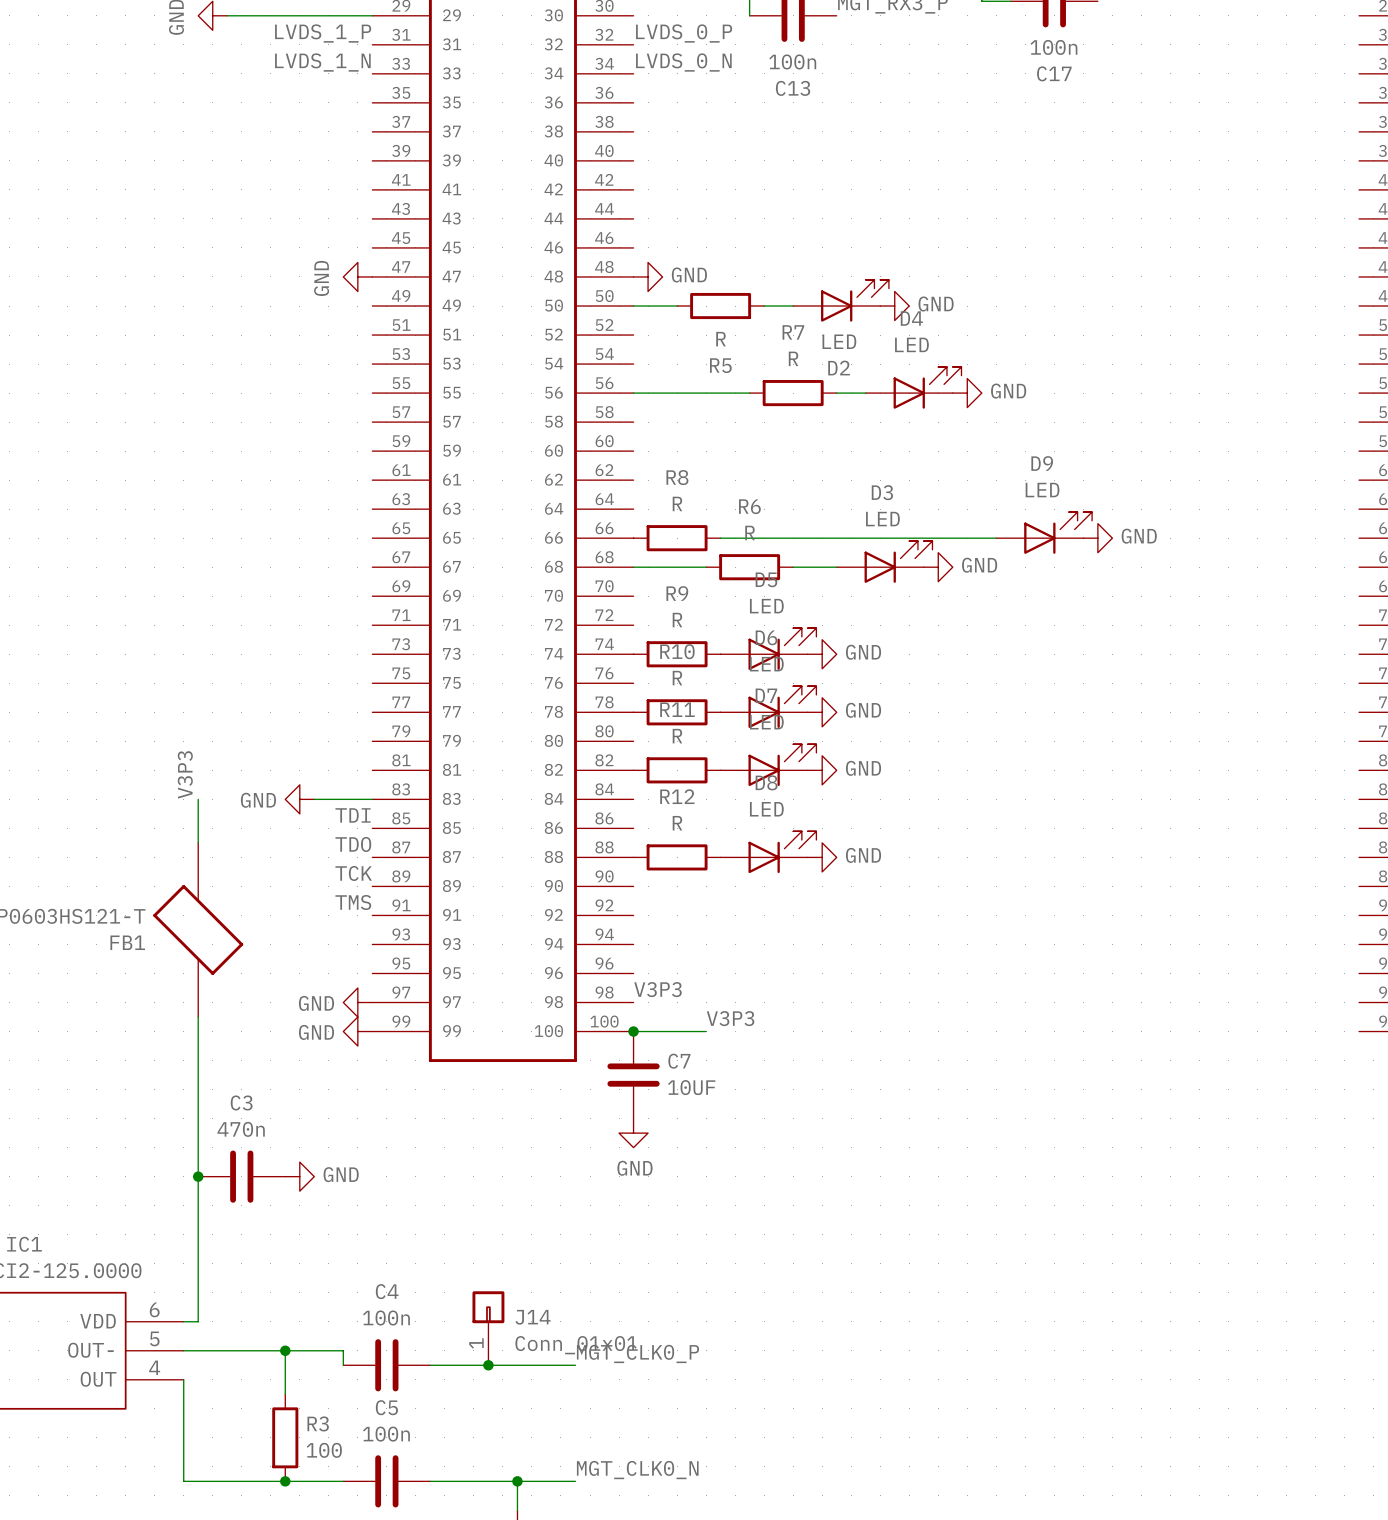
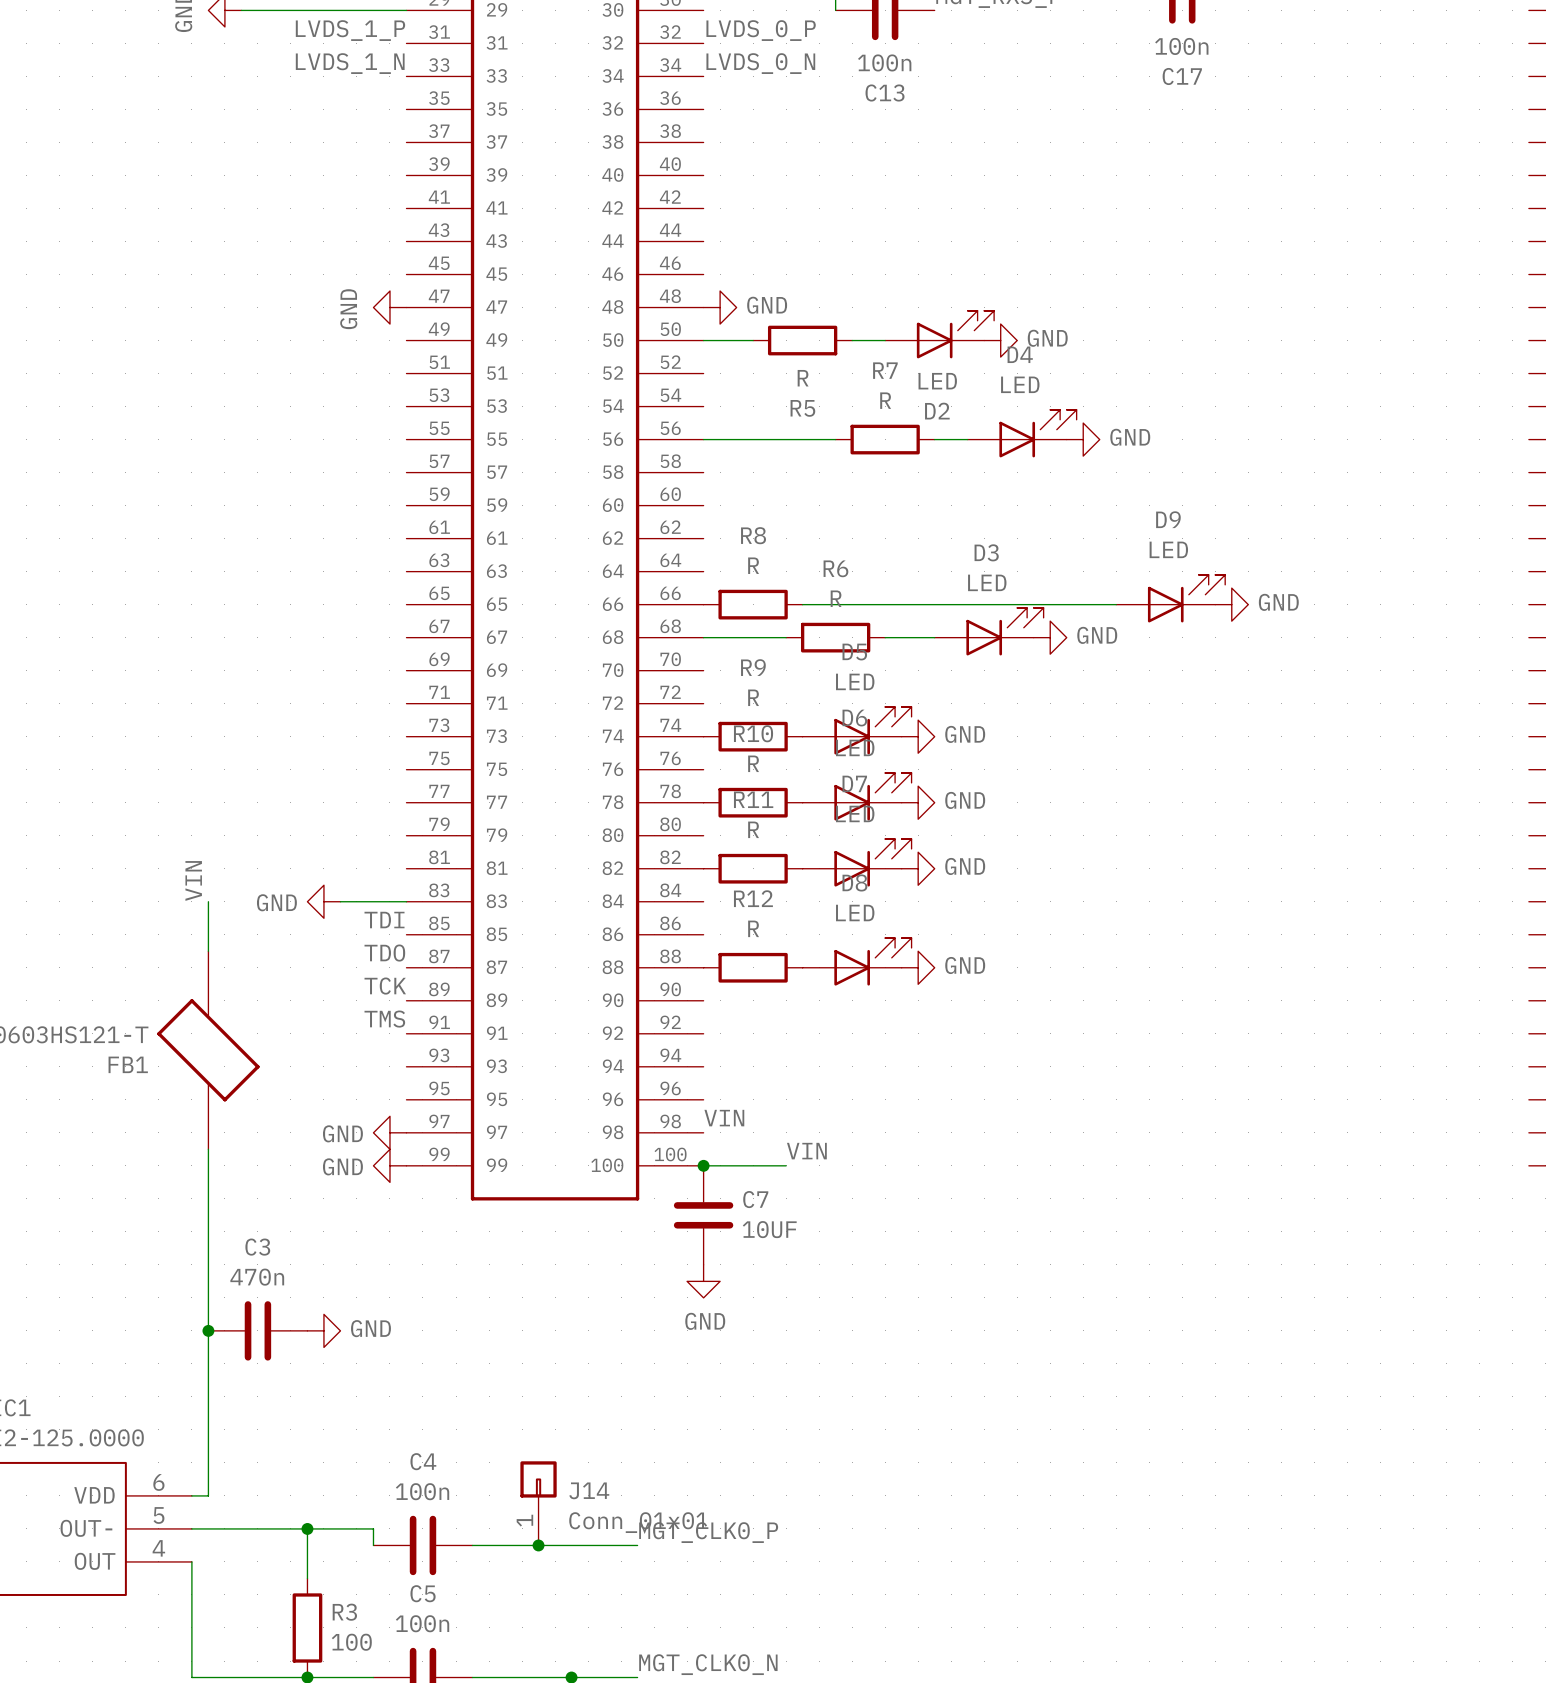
label: V3P3 (185, 774) -> VIN (193, 880)
label: V3P3 (658, 989) -> VIN (724, 1118)
label: V3P3 (730, 1018) -> VIN (806, 1151)

